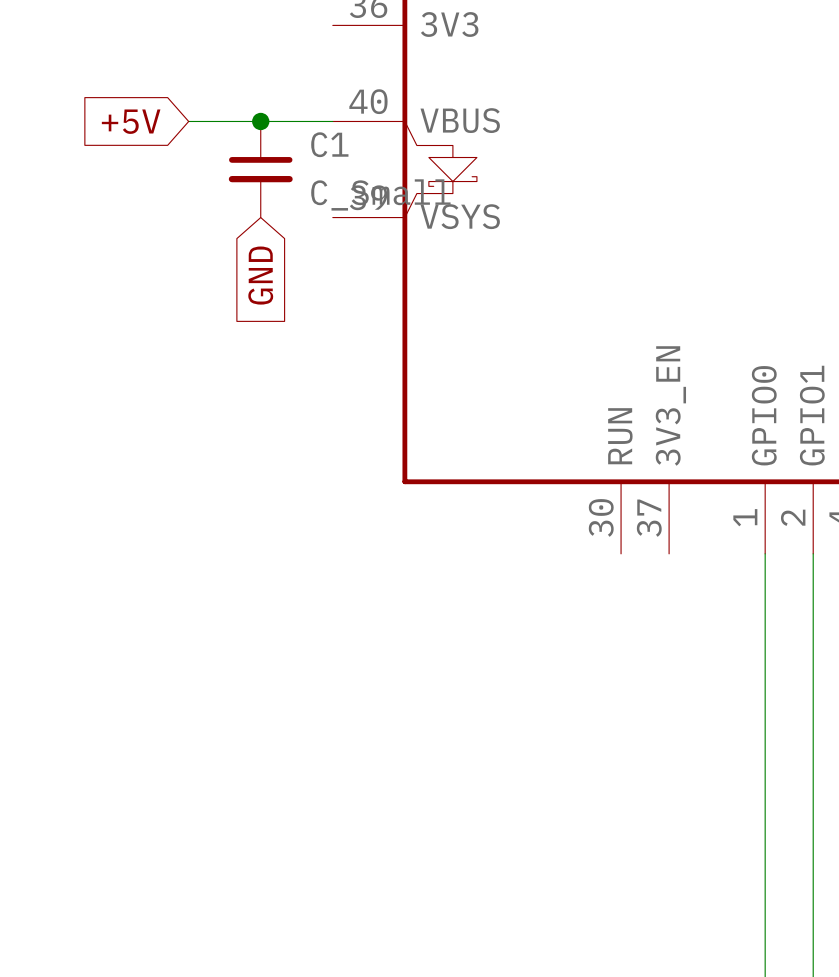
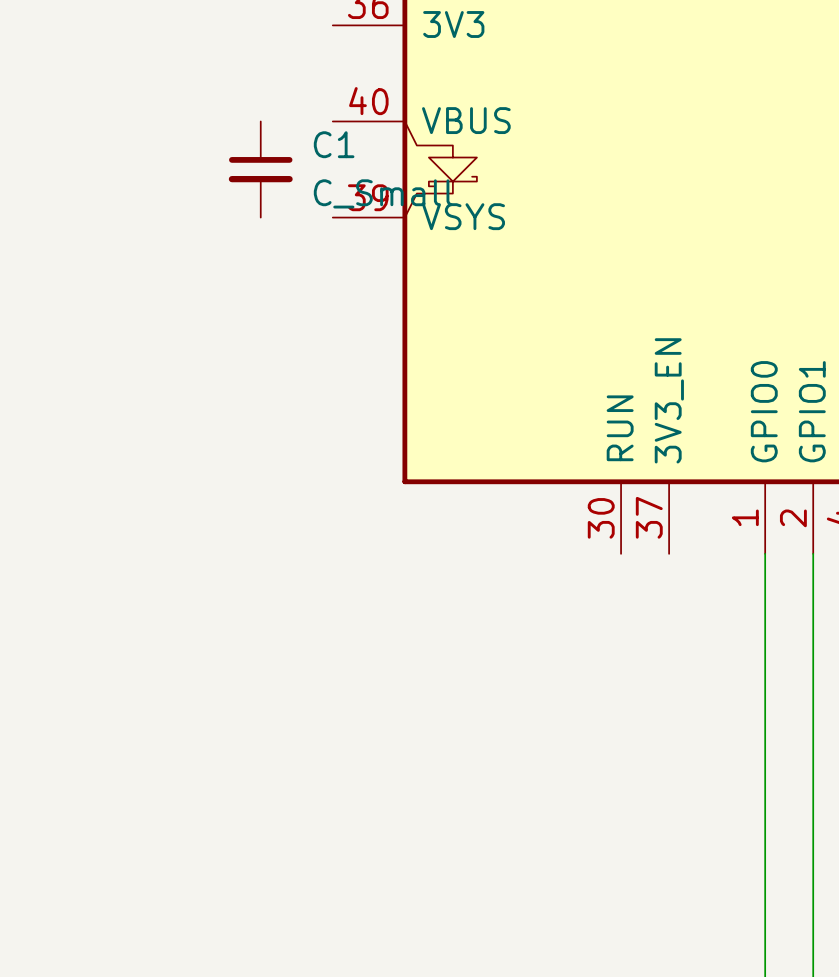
global label: +5V (131, 121) -> none
wire: (188, 121) (332, 121) -> none
junction: (260, 121) -> none
global label: GND (260, 275) -> none

